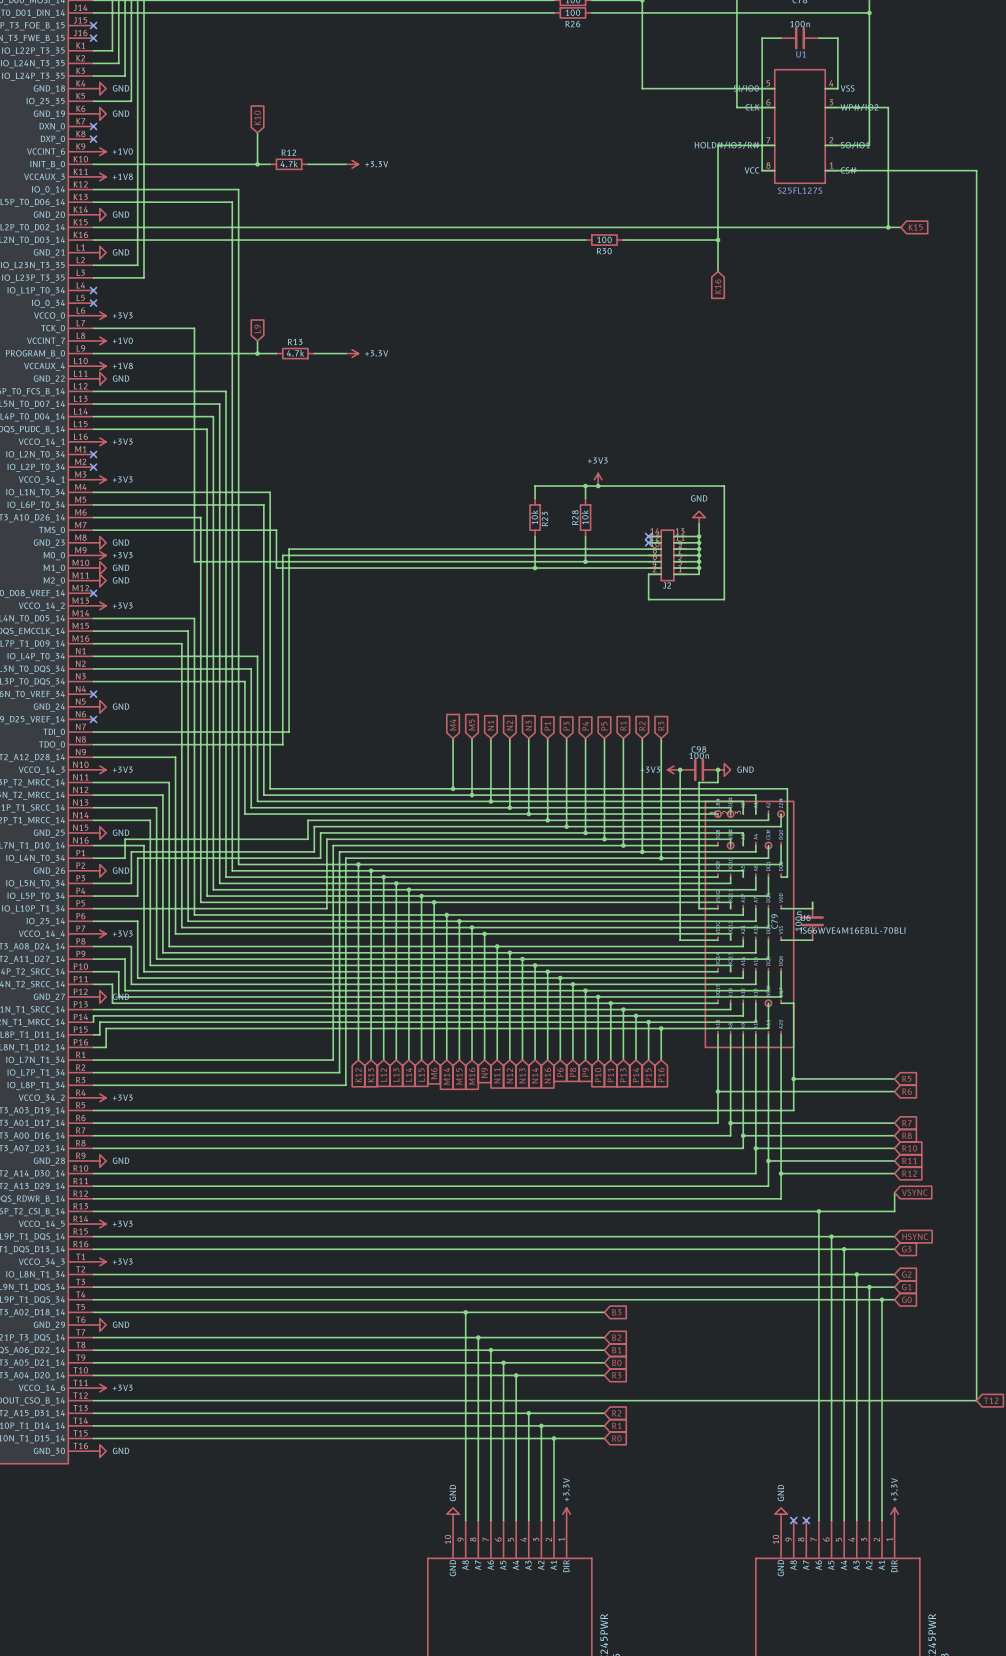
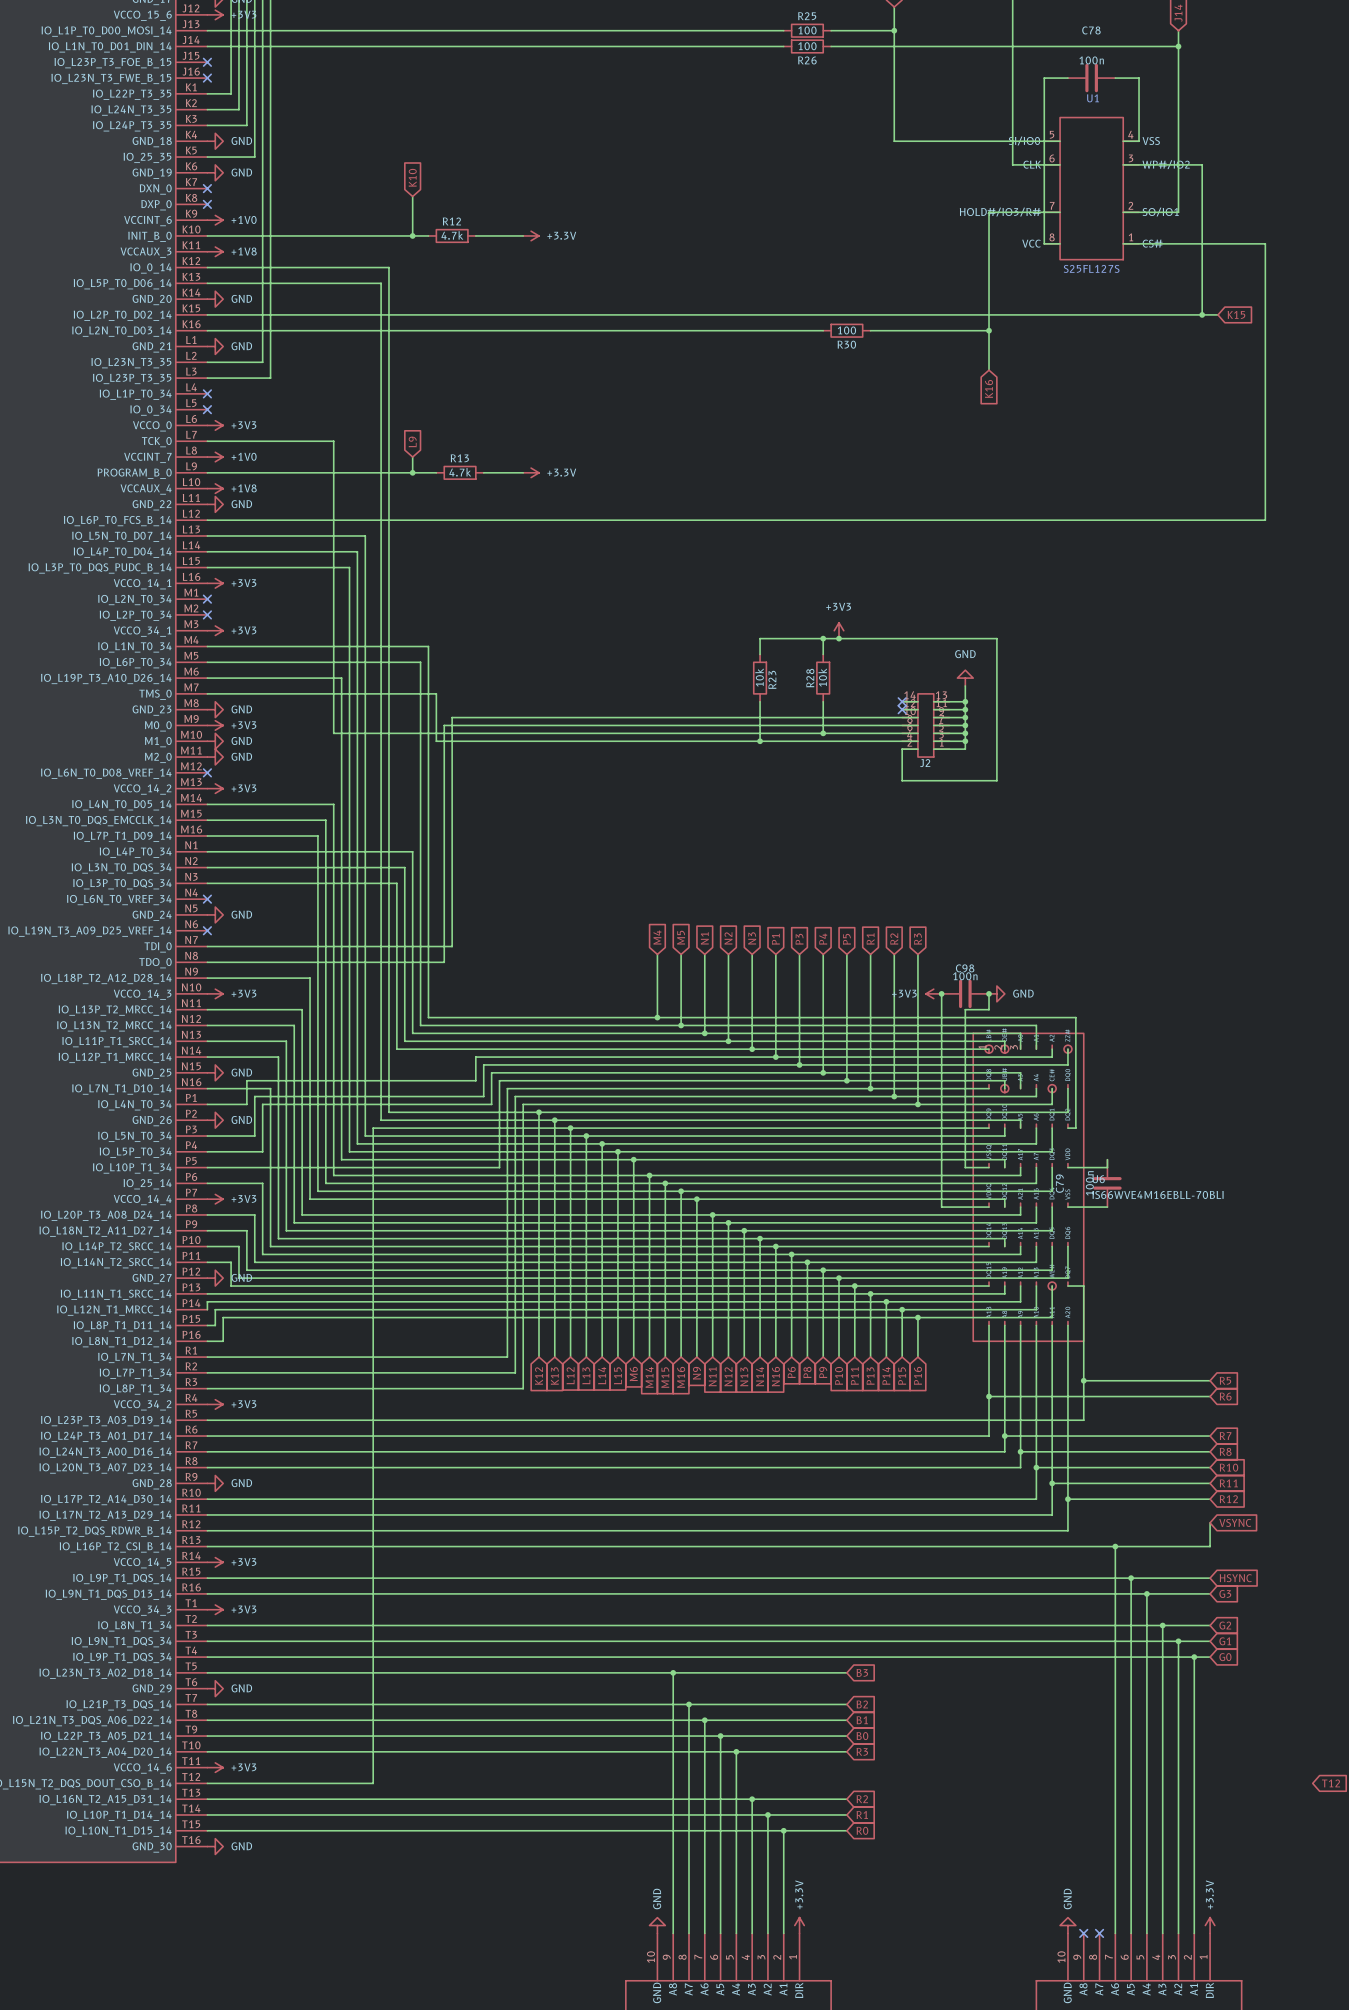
wire: (938, 170) (976, 170) (976, 1400) (225, 1400) -> (373, 1128) (373, 1783)
wire: (225, 391) (225, 877) -> (373, 520) (1265, 520) (1265, 243)

